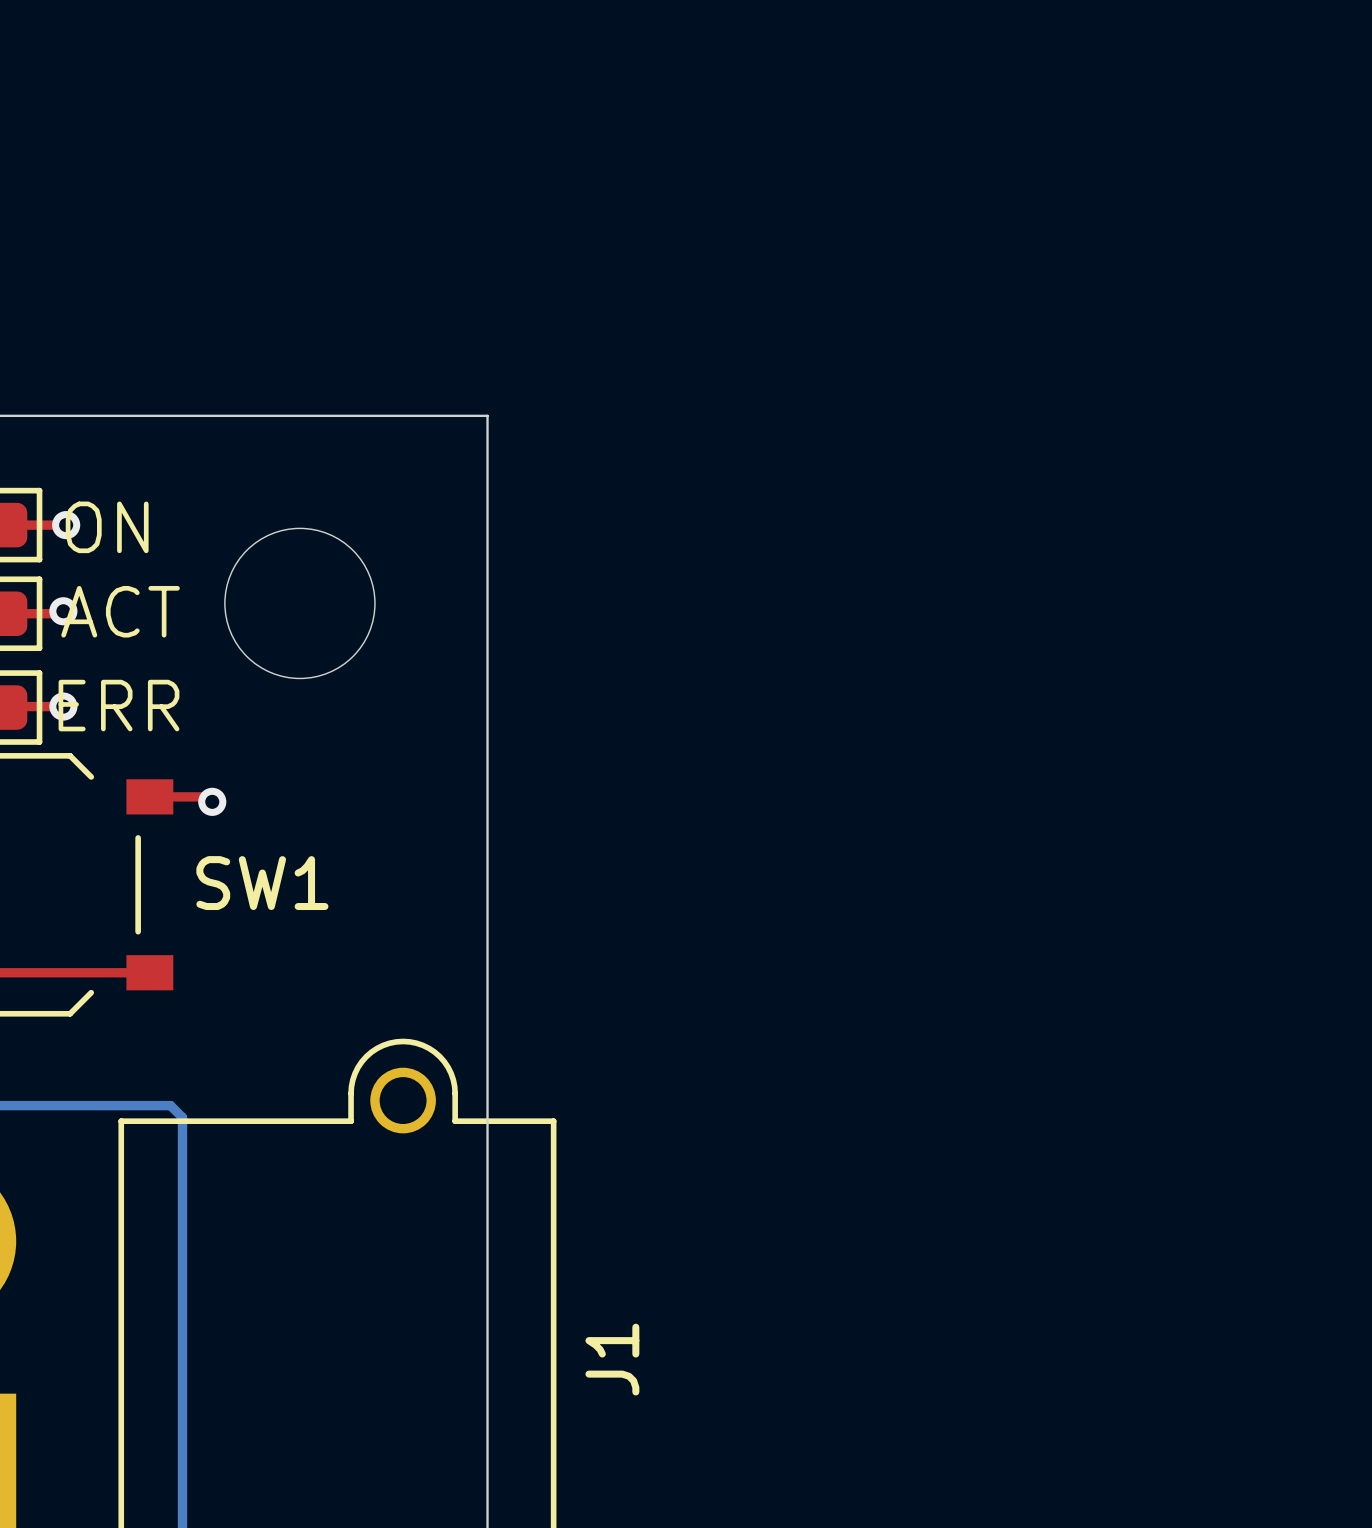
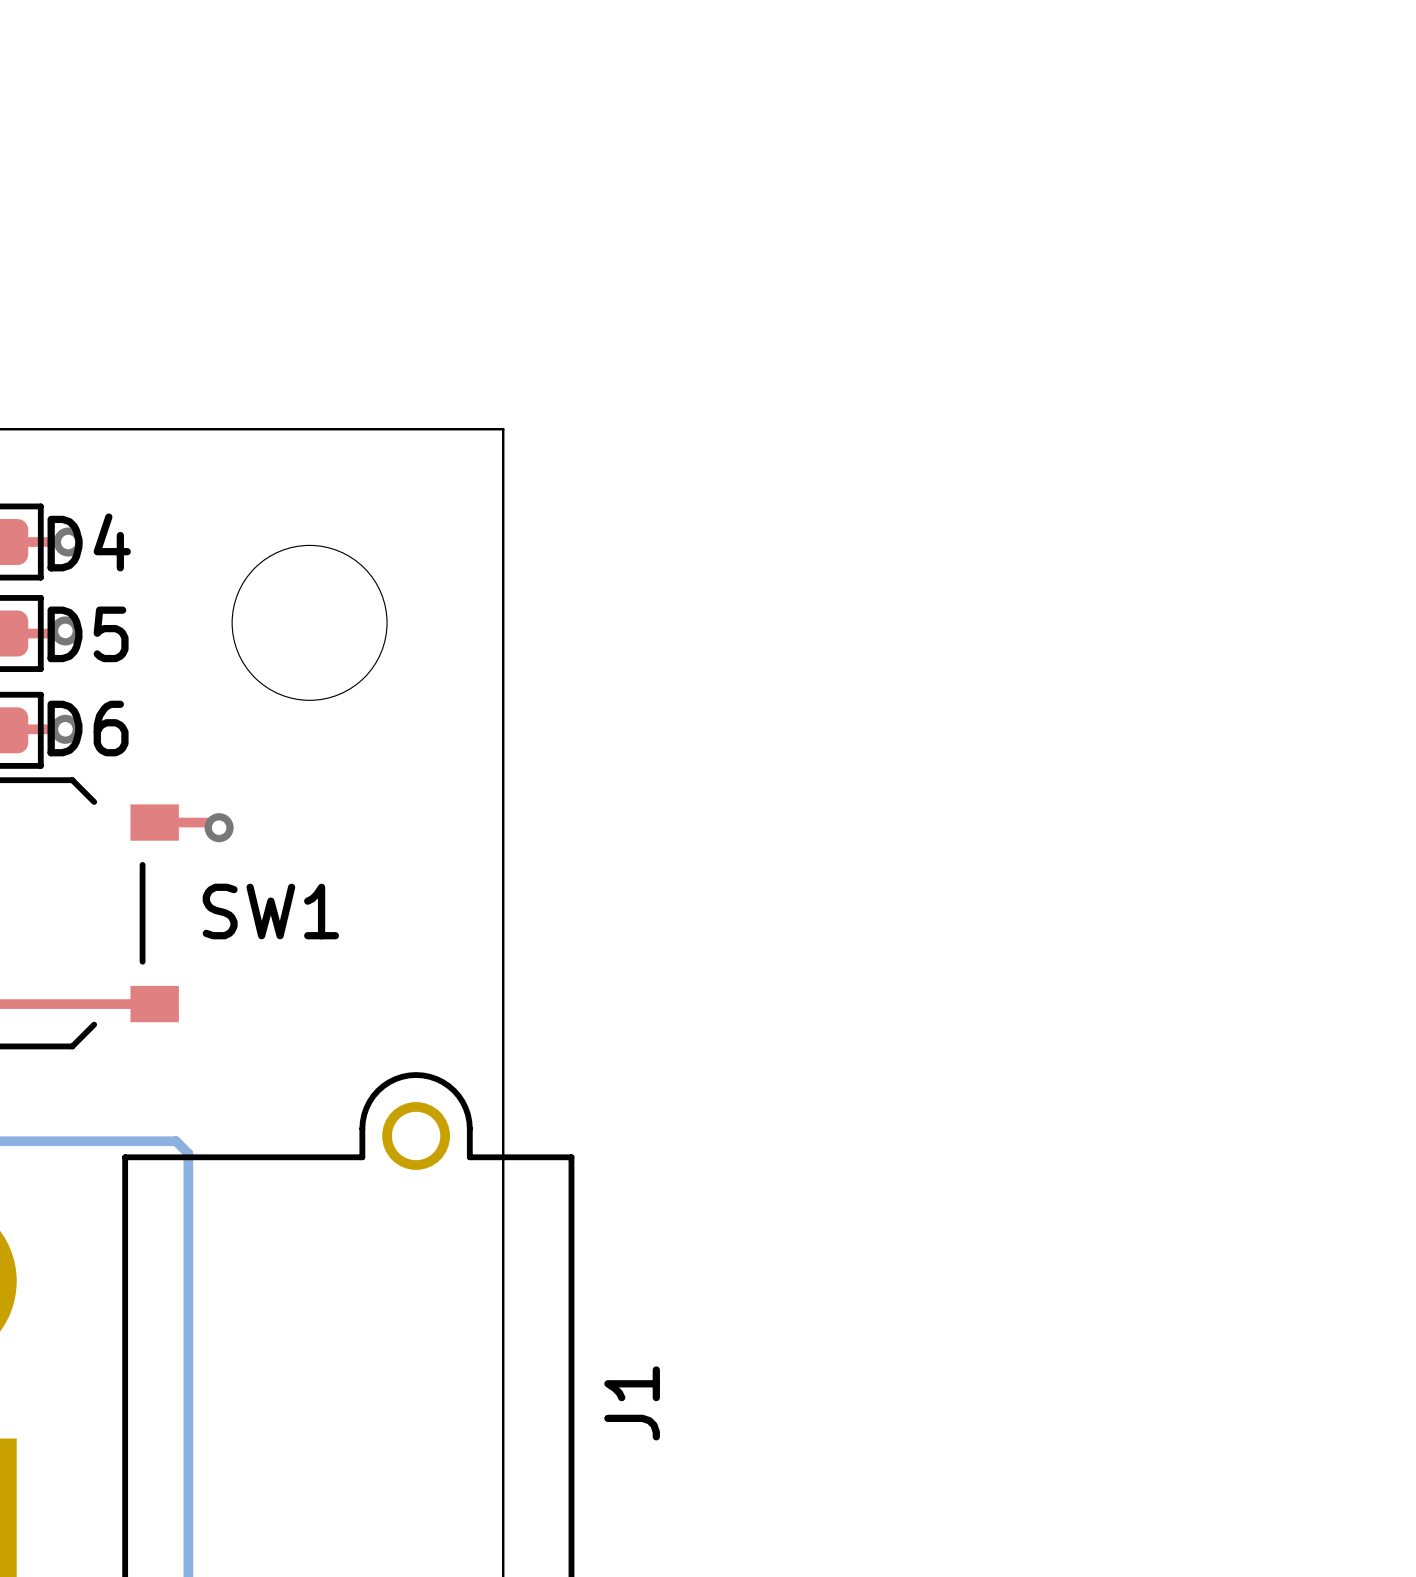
D4 name: none -> D4 (89, 542)
text: ON (107, 527) -> none
text: ACT (120, 611) -> none
D5 name: none -> D5 (88, 634)
D6 name: none -> D6 (88, 728)
text: ERR (118, 705) -> none

